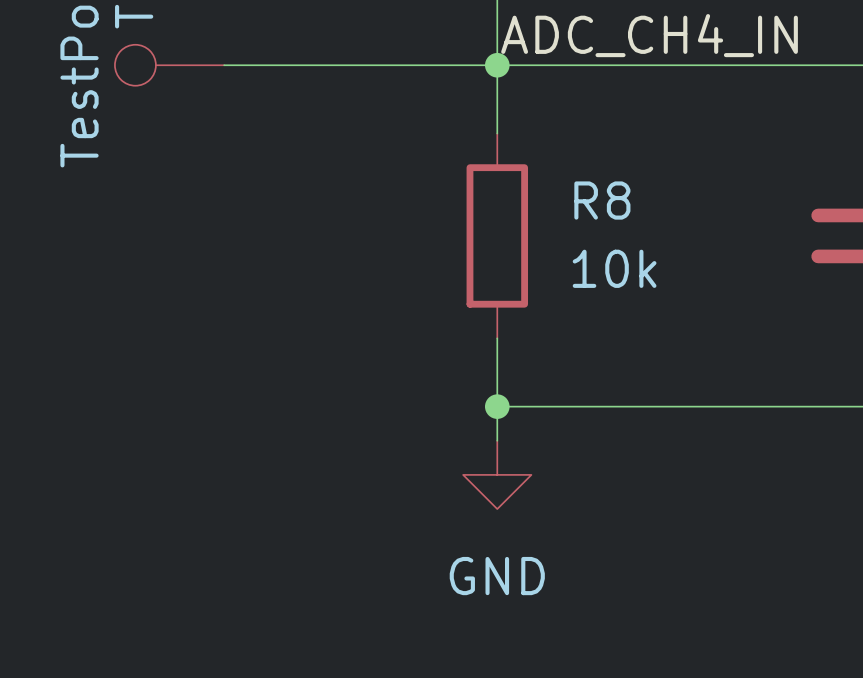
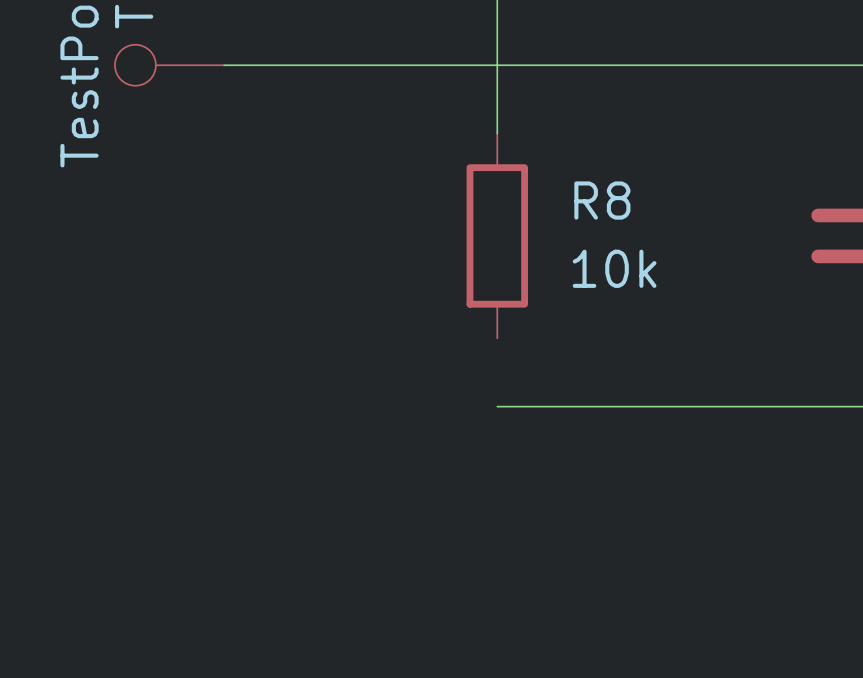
label: ADC_CH4_IN (649, 35) -> none
junction: (497, 65) -> none
wire: (497, 338) (497, 440) -> none
junction: (497, 406) -> none
power symbol: GND (497, 474) -> none

